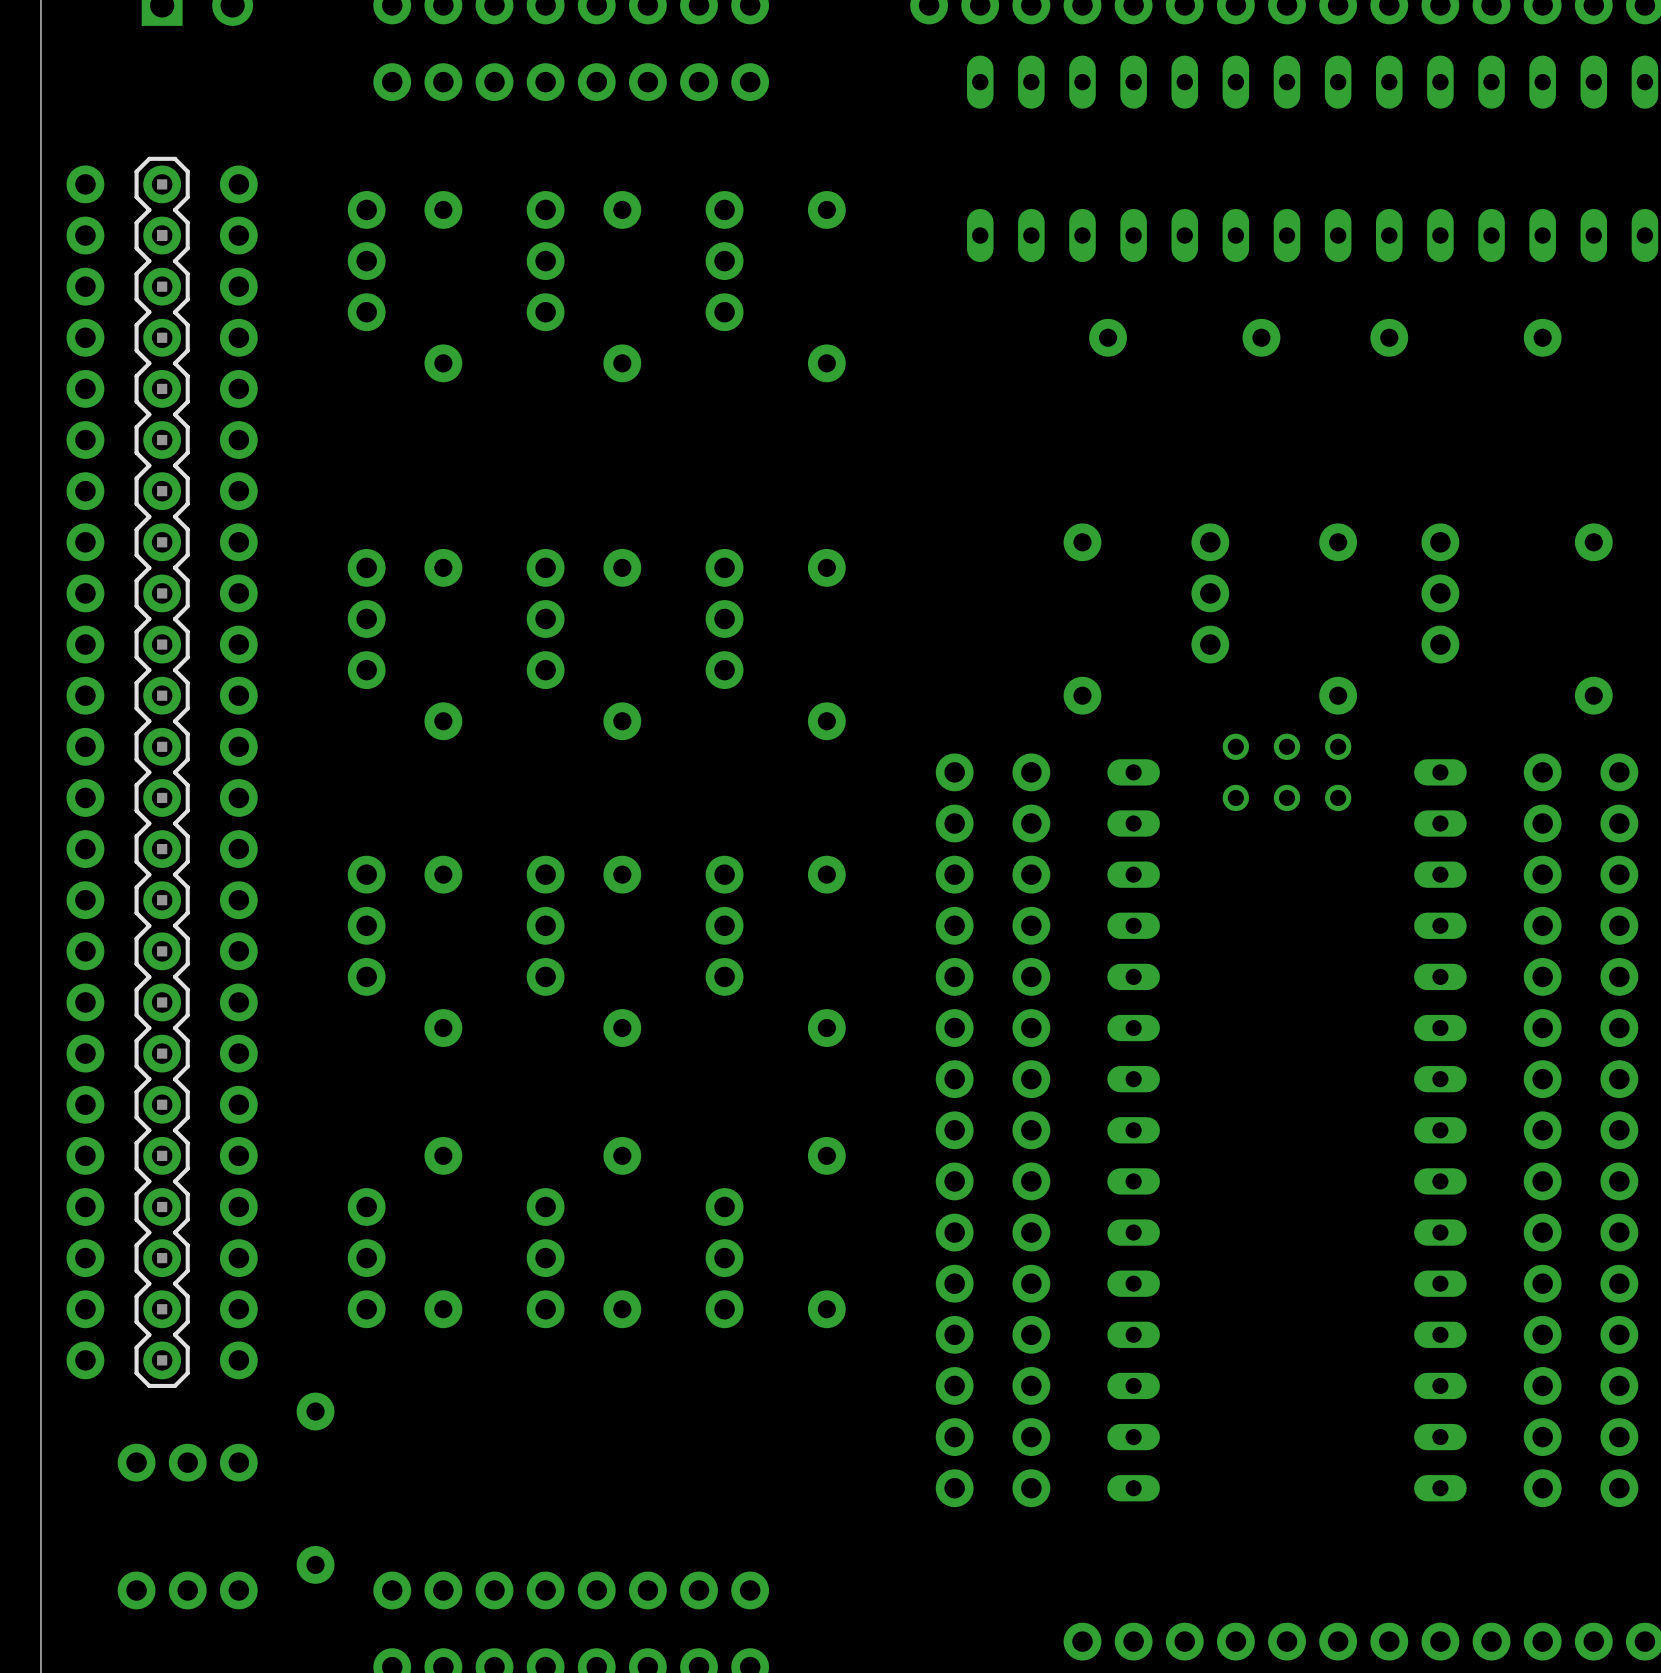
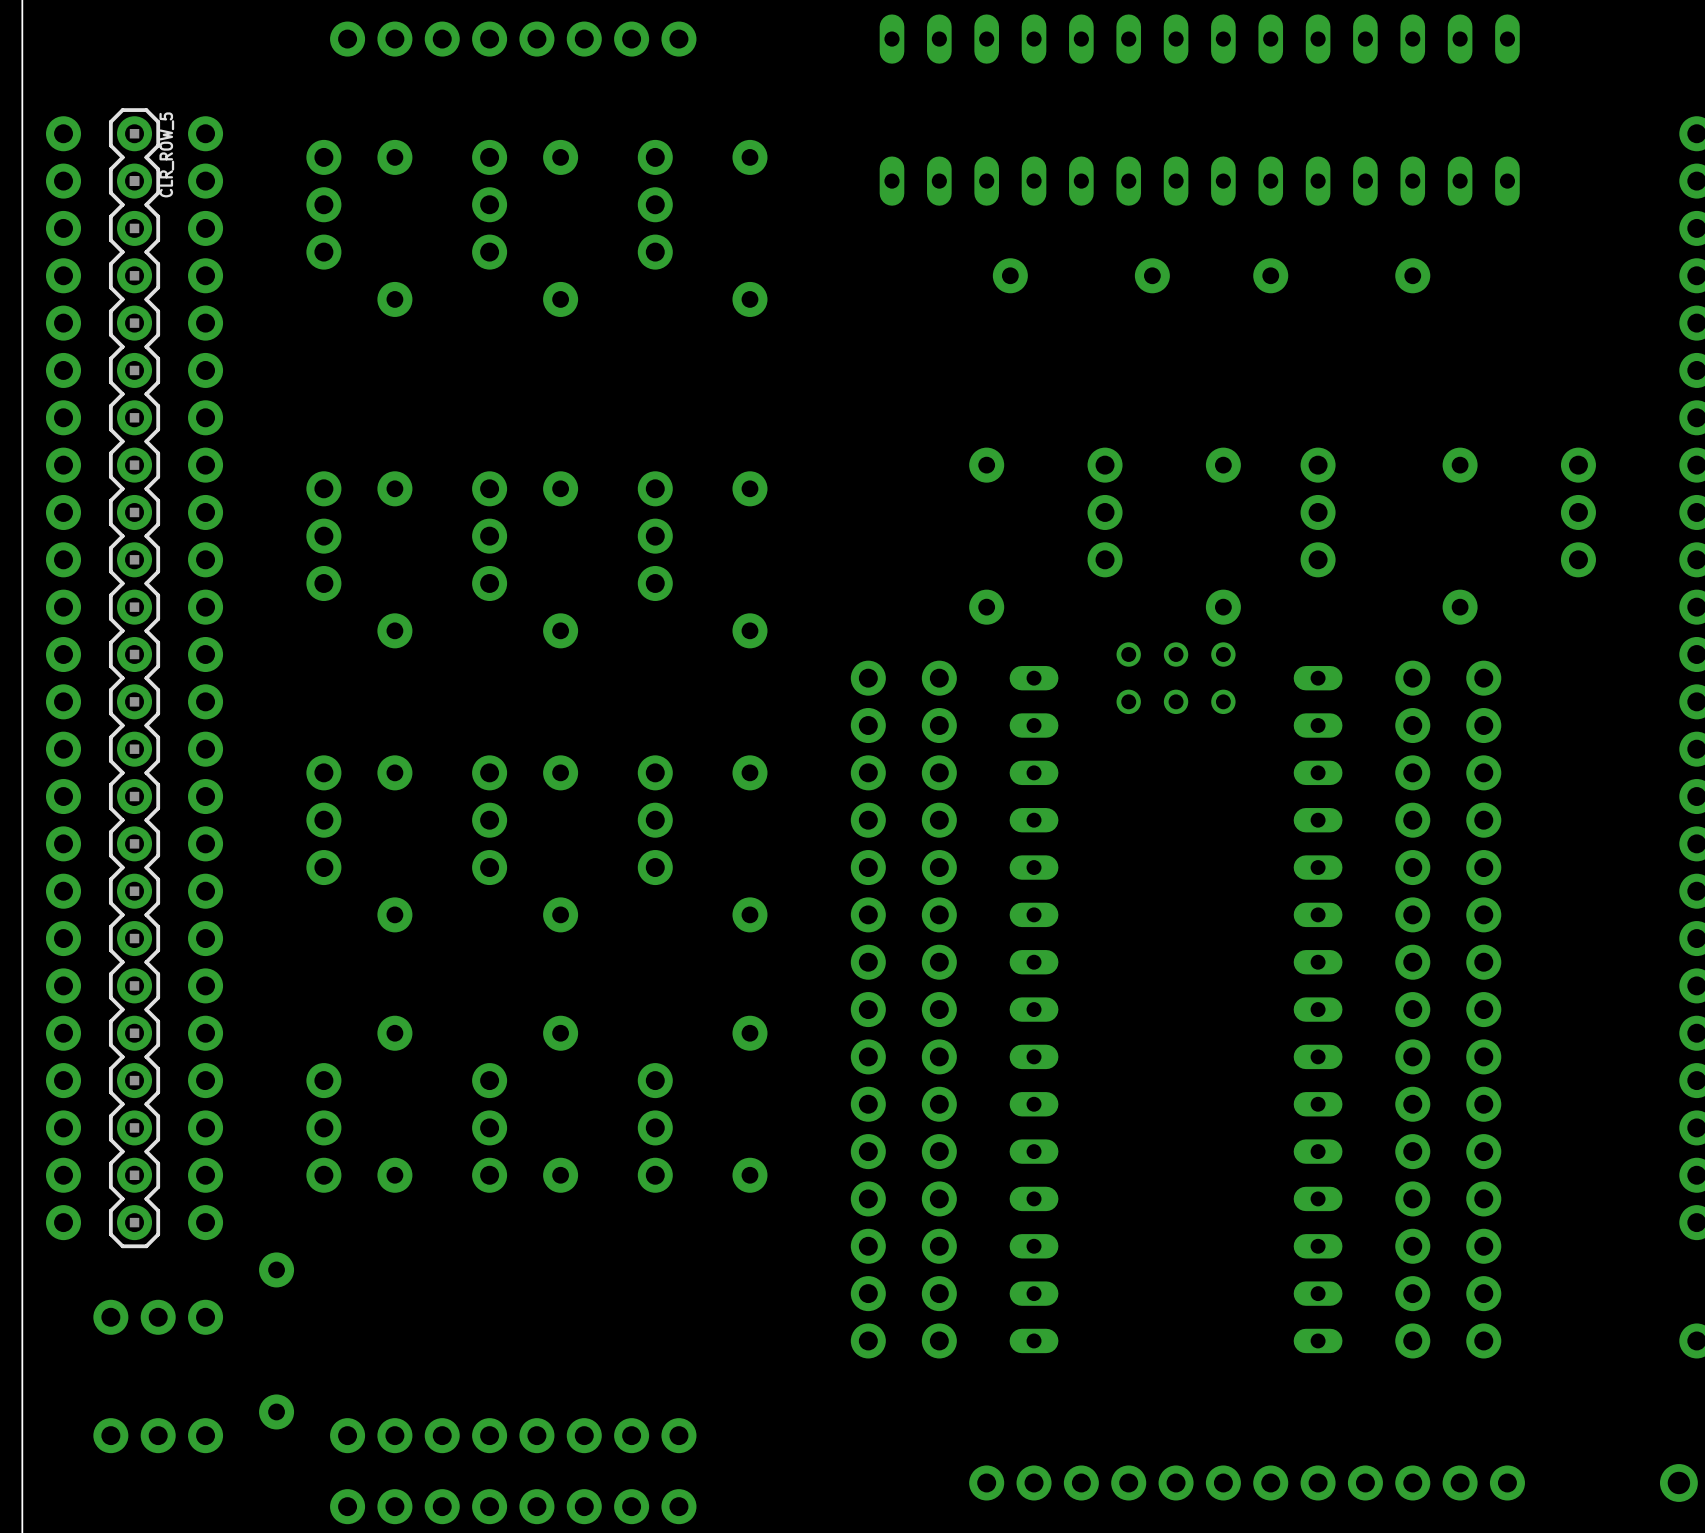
CLR_ROW_5 name: none -> CLR_ROW_5 (166, 154)

